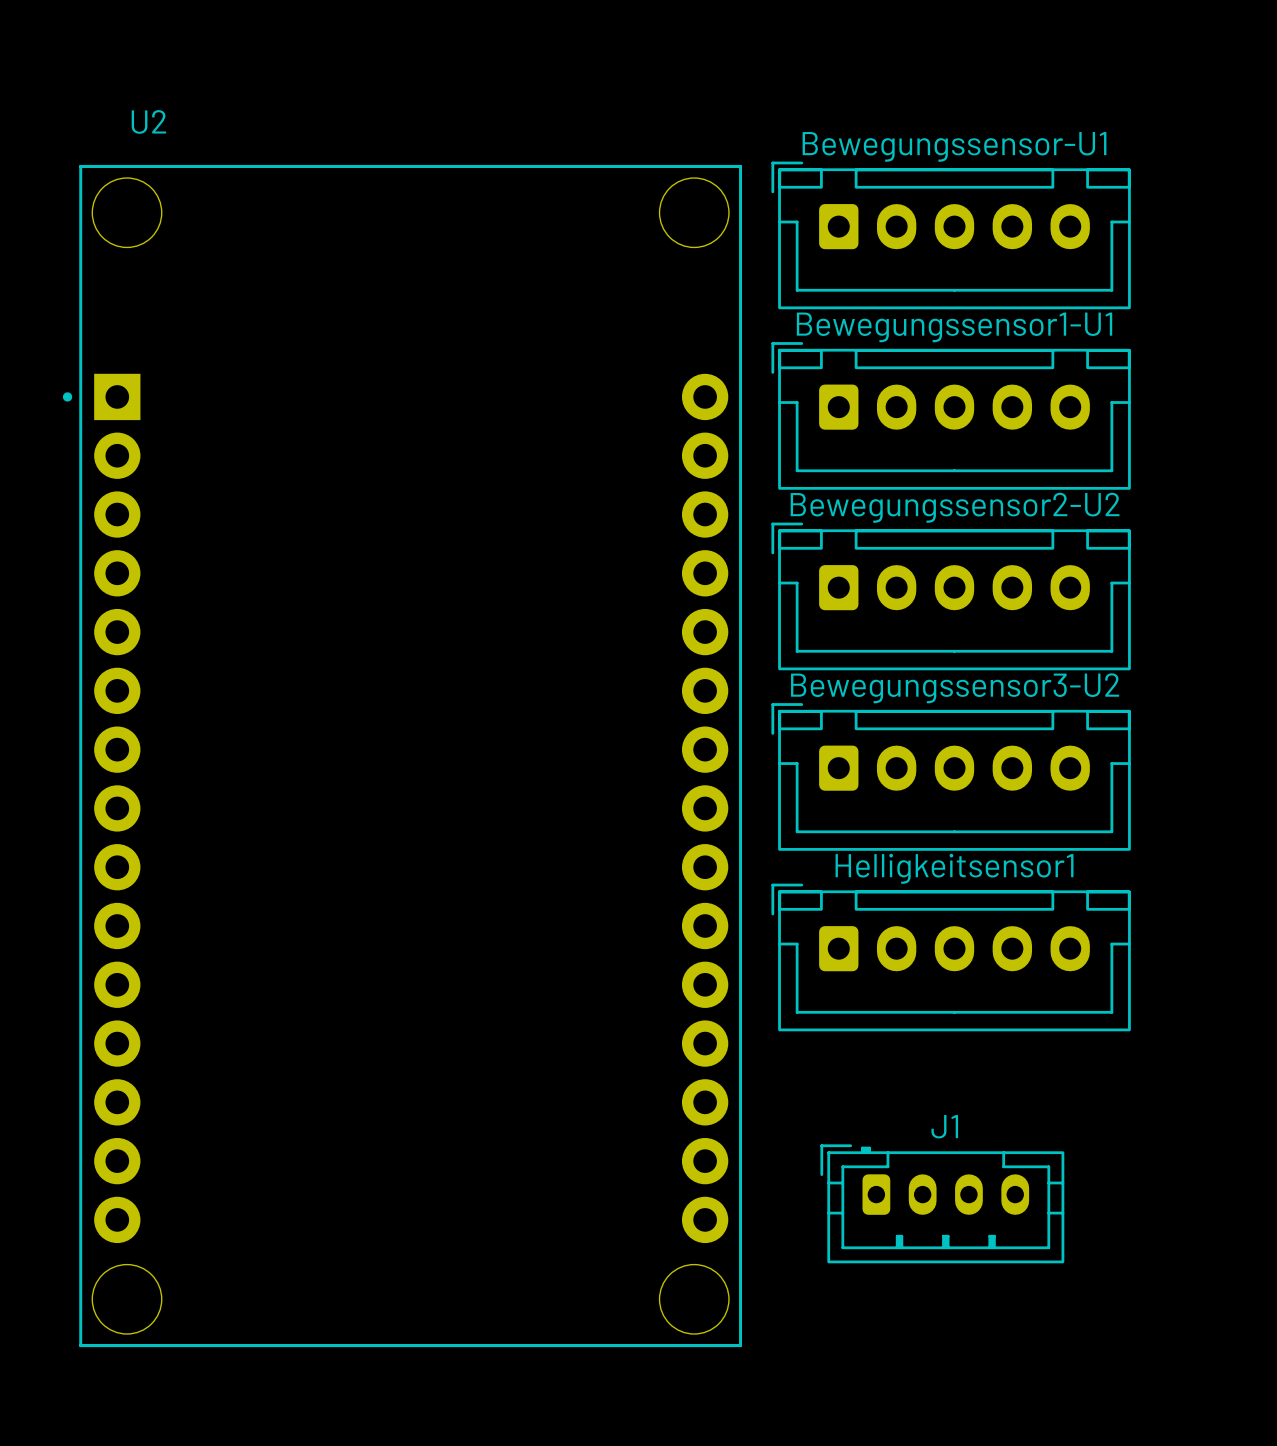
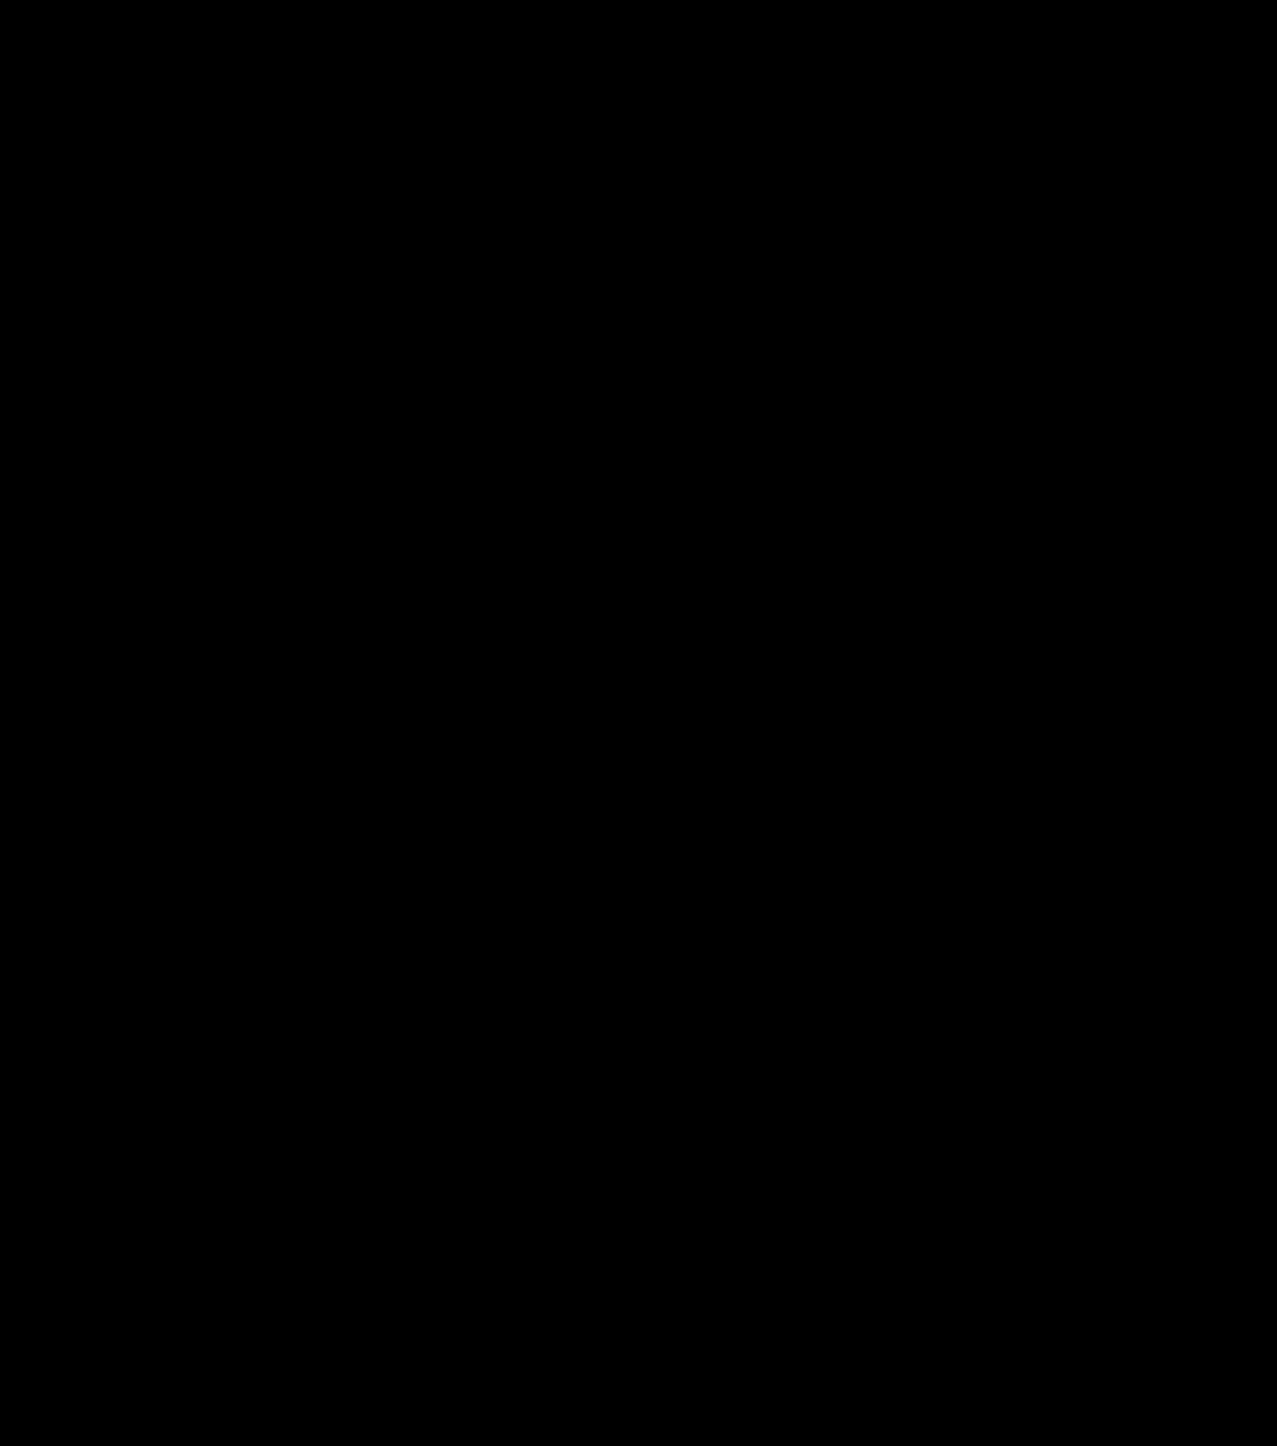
Bewegungssensor-U1: (951, 235) -> none
Bewegungssensor1-U1: (951, 415) -> none
Bewegungssensor2-U2: (951, 596) -> none
U2: (402, 756) -> none
Bewegungssensor3-U2: (951, 776) -> none
Helligkeitsensor1: (951, 957) -> none
J1: (942, 1203) -> none

